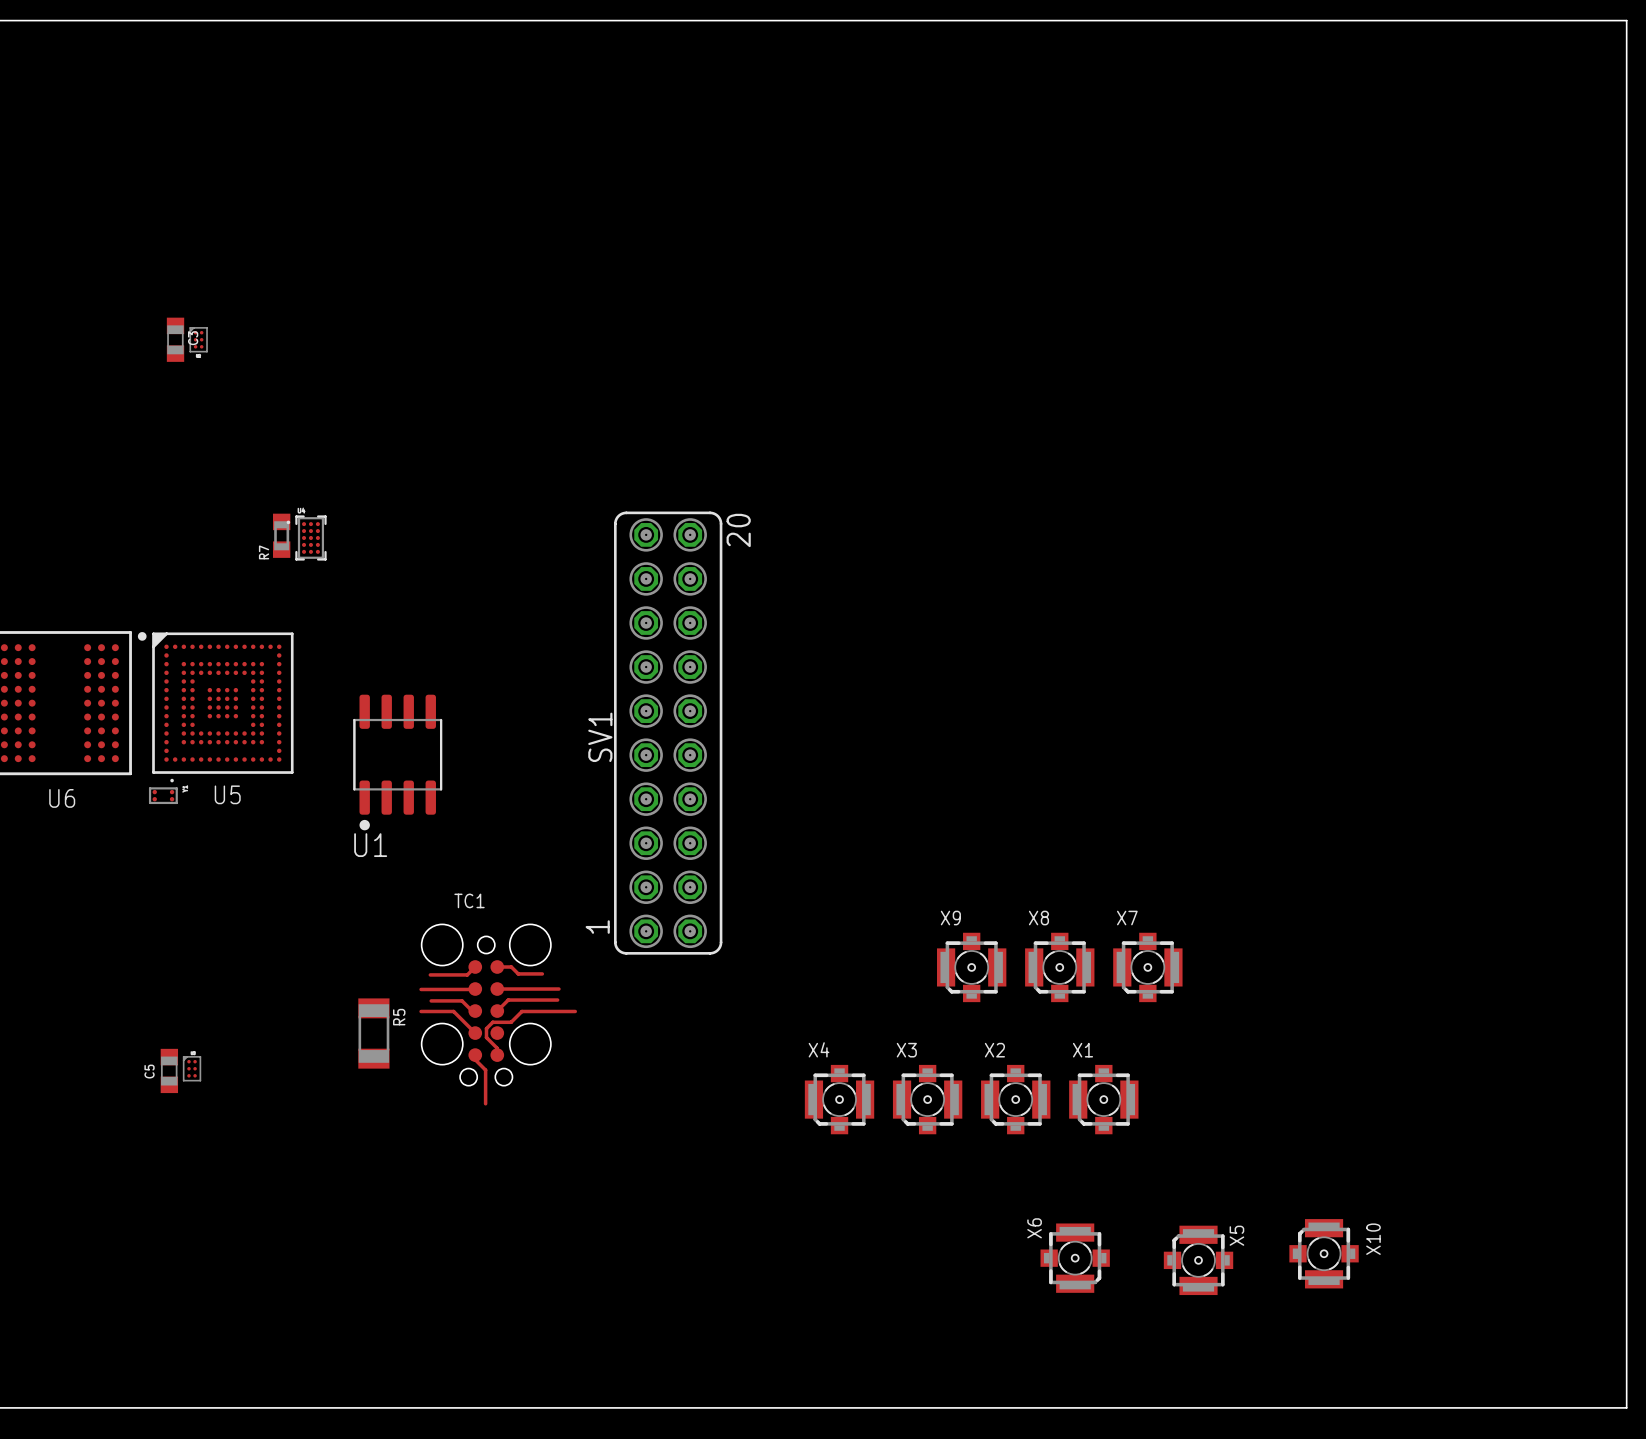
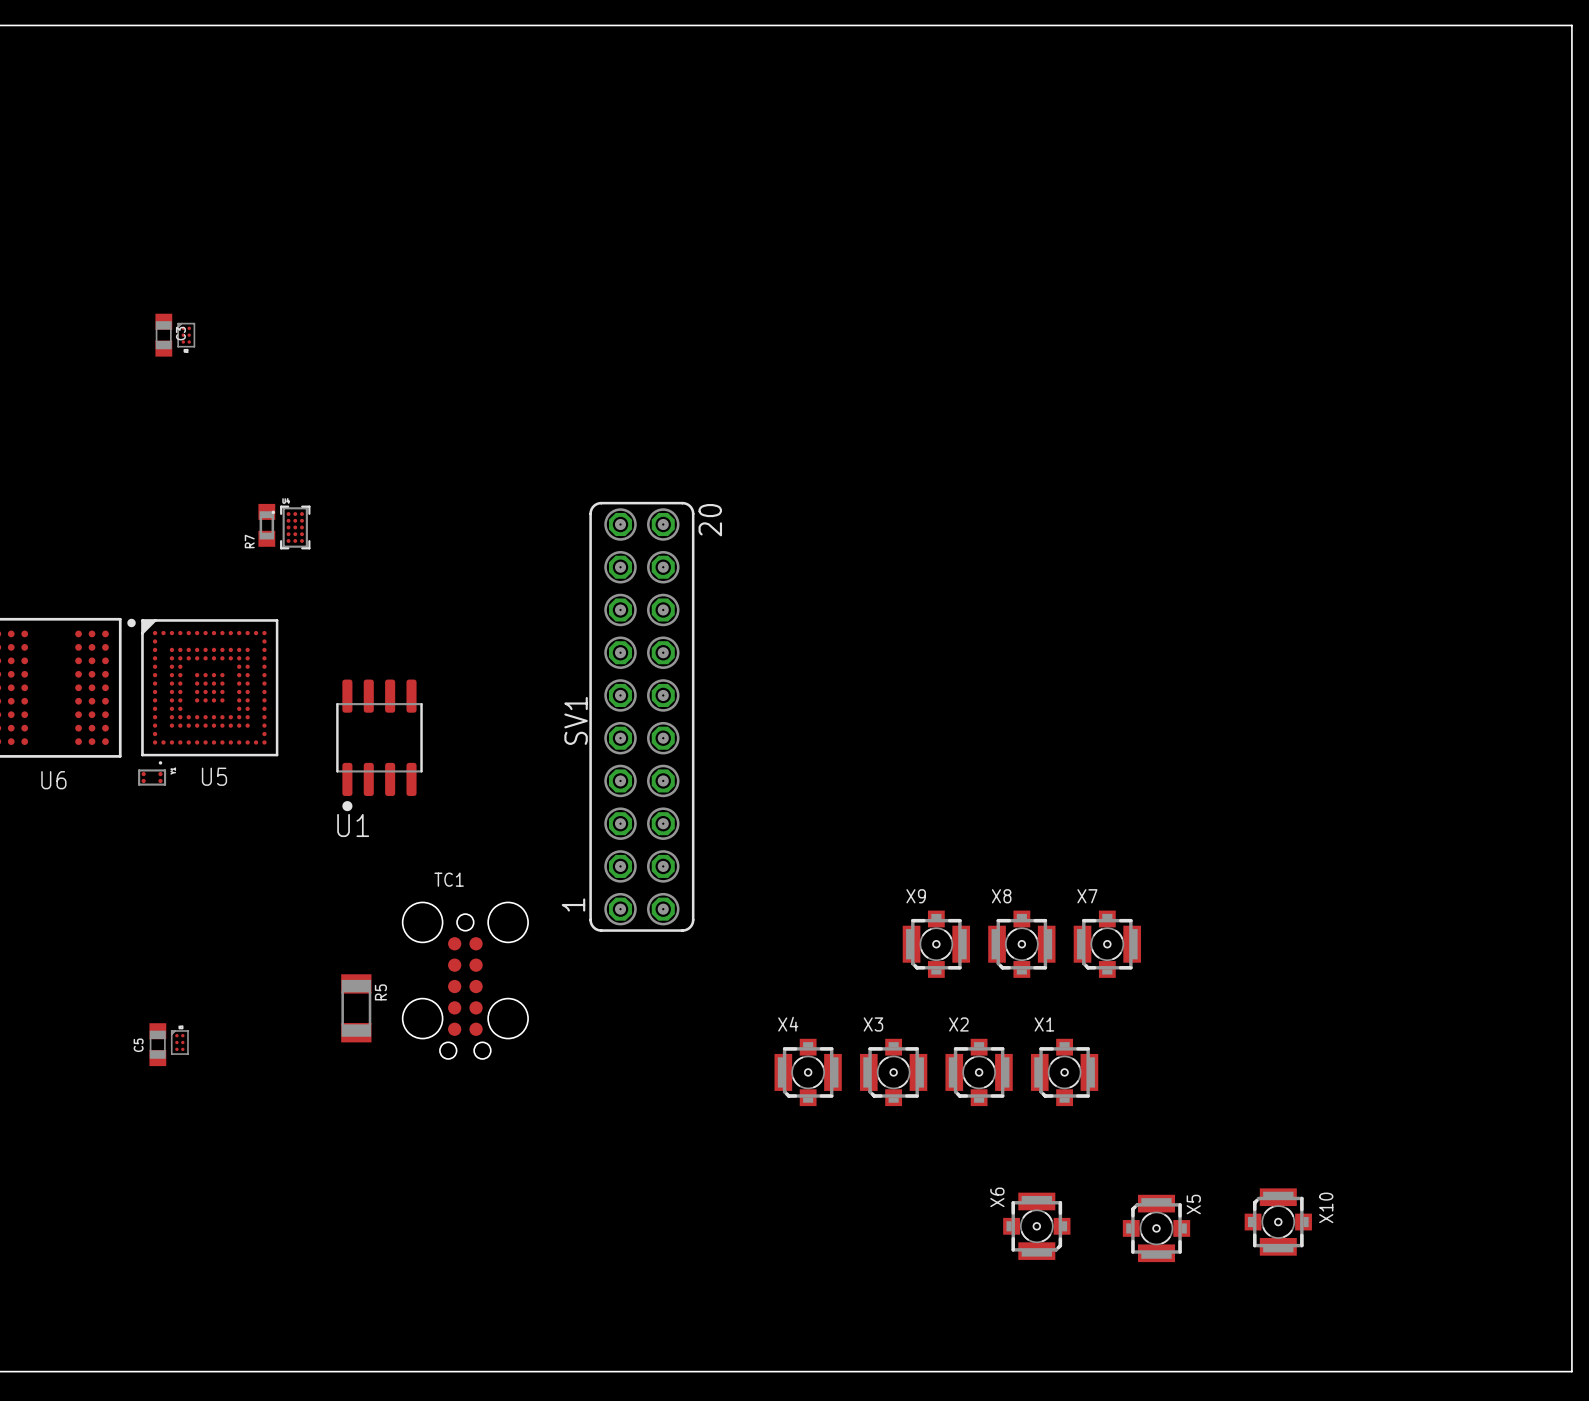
track: (475, 967) (467, 974) (430, 974) -> none
track: (497, 967) (511, 967) (518, 973) (542, 973) -> none
track: (475, 989) (421, 989) -> none
track: (497, 989) (558, 989) -> none
track: (431, 1000) (462, 1000) (472, 1011) (475, 1011) -> none
track: (557, 1000) (508, 1000) (497, 1011) -> none
track: (421, 1011) (453, 1011) (475, 1033) -> none
track: (575, 1011) (521, 1011) (511, 1022) (492, 1022) (486, 1028) (486, 1037) (497, 1048) (497, 1055) -> none
track: (475, 1055) (475, 1059) (485, 1070) (485, 1103) -> none

